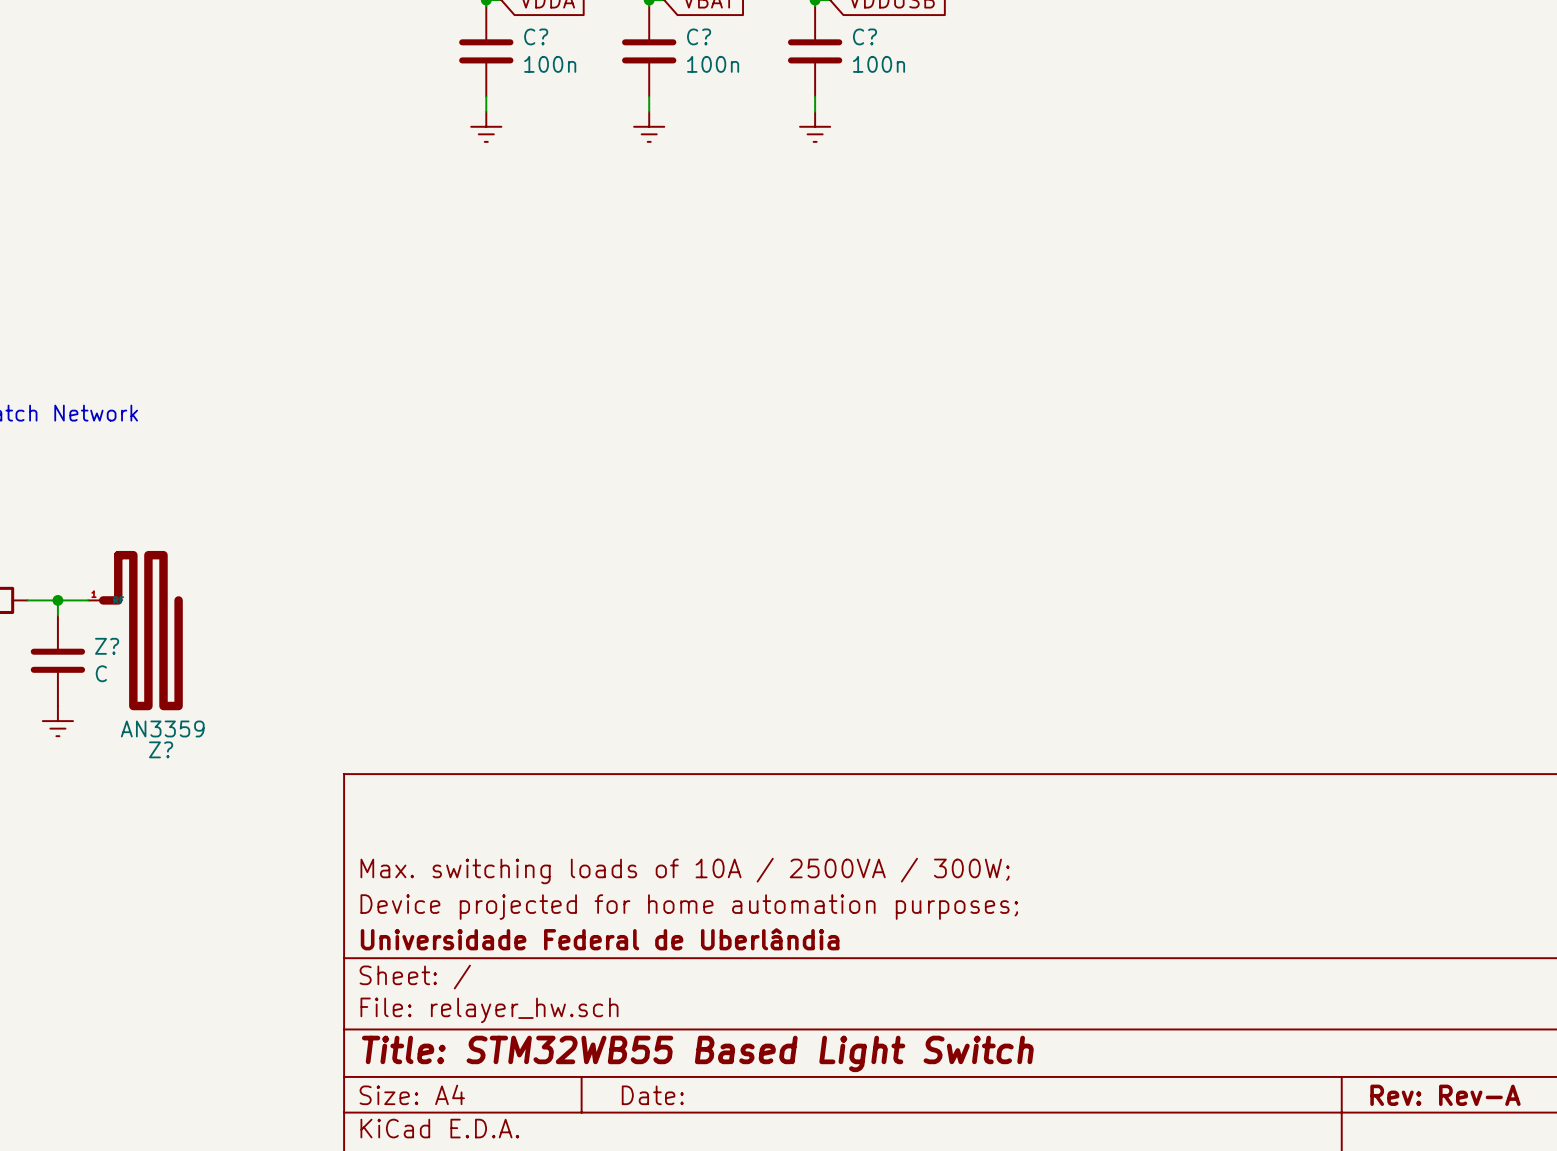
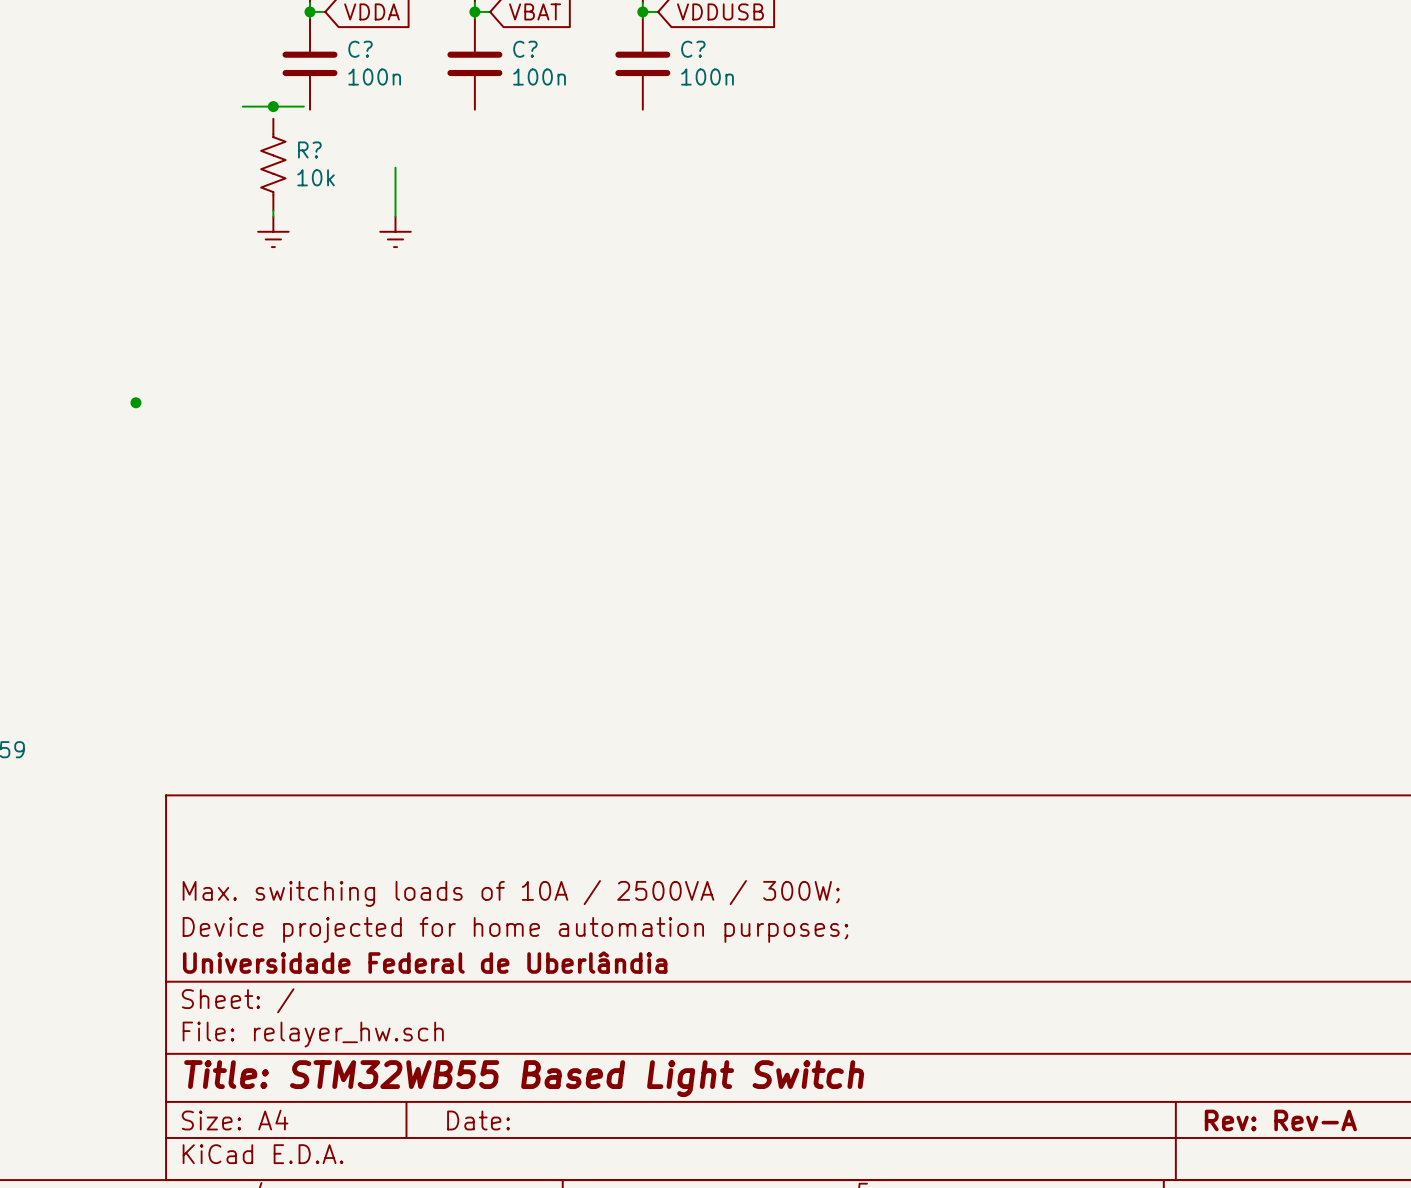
wire: none -> (242, 106) (303, 106)
junction: none -> (273, 106)
wire: (486, 96) (486, 111) -> none
wire: (649, 96) (649, 111) -> none
wire: (815, 96) (815, 111) -> none
power symbol: (486, 126) -> none
power symbol: (649, 126) -> none
power symbol: (815, 126) -> none
R?: none -> 10k (273, 164)
wire: none -> (395, 167) (395, 216)
wire: none -> (273, 210) (273, 216)
power symbol: none -> (273, 231)
power symbol: none -> (395, 231)
junction: none -> (135, 402)

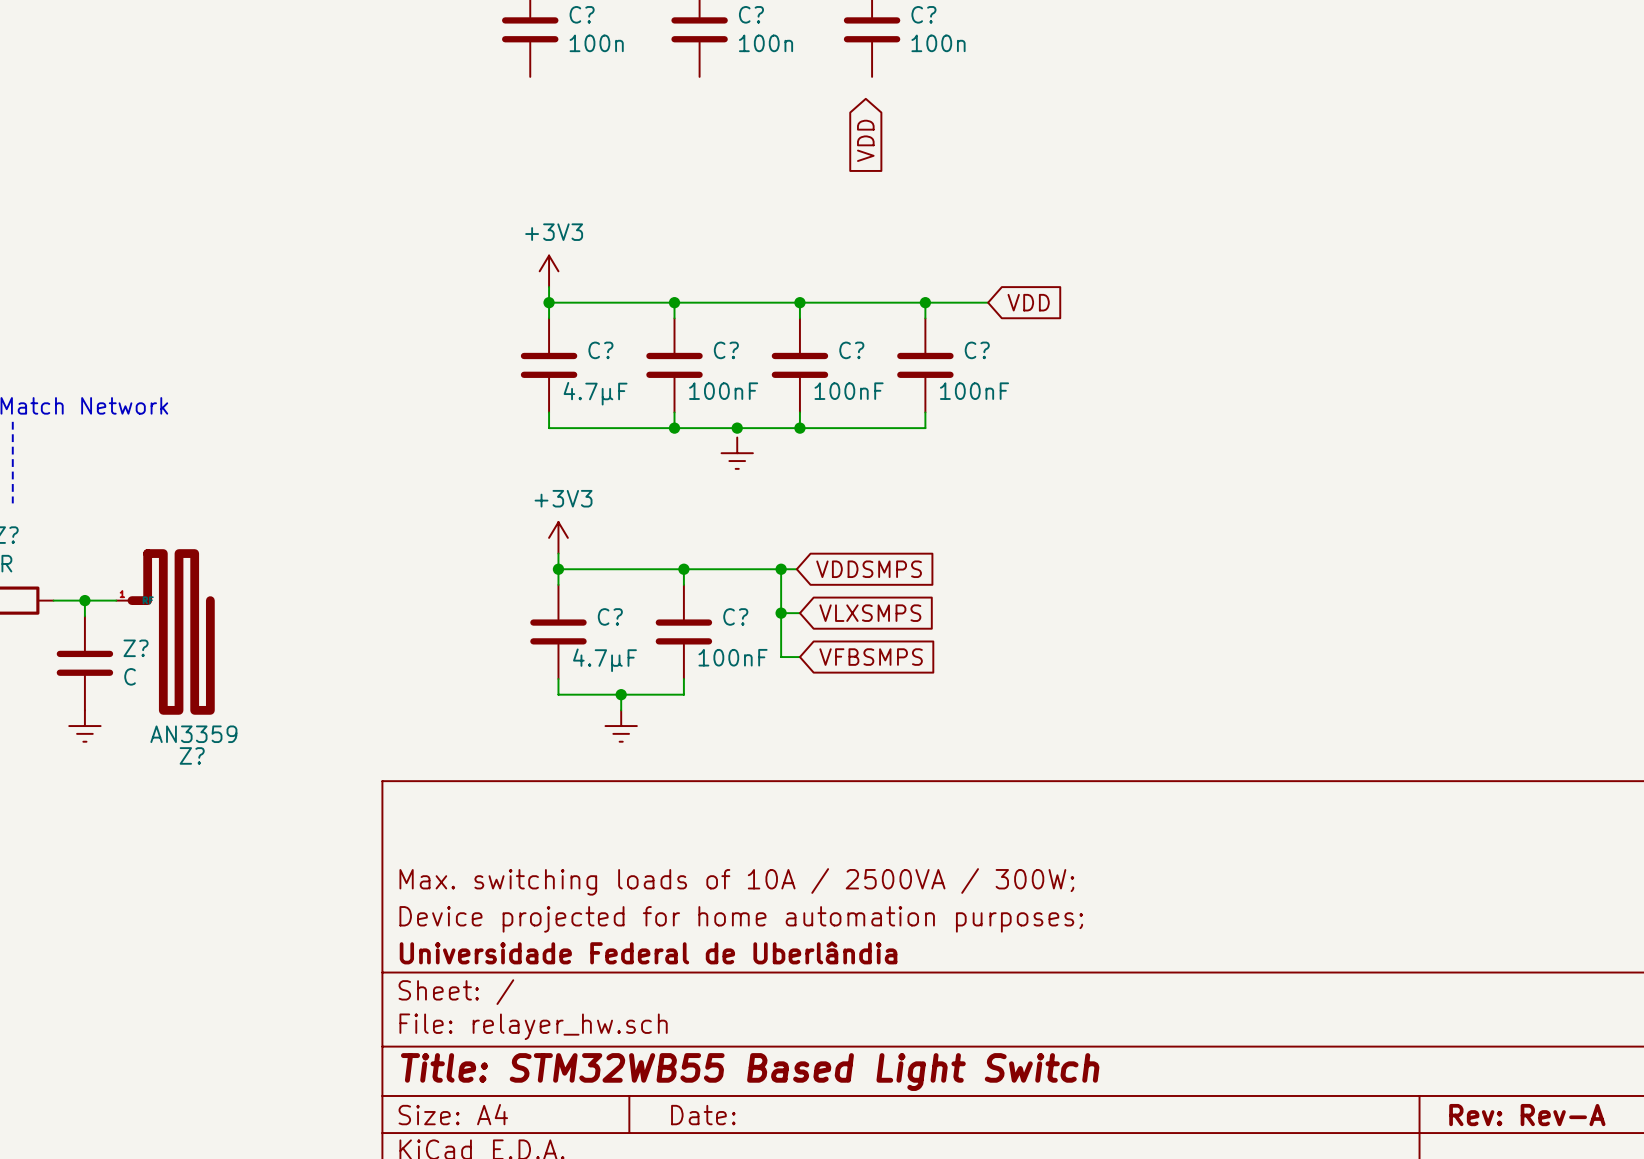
wire: (242, 106) (303, 106) -> none
junction: (273, 106) -> none
R?: 10k (273, 164) -> none
wire: (395, 167) (395, 216) -> none
global label: none -> VDD (865, 140)
wire: (273, 210) (273, 216) -> none
power symbol: (273, 231) -> none
power symbol: (395, 231) -> none
power symbol: none -> +3V3 (549, 271)
wire: none -> (549, 286) (549, 318)
wire: none -> (549, 302) (988, 302)
junction: none -> (549, 302)
wire: none -> (674, 302) (674, 318)
junction: none -> (674, 302)
wire: none -> (799, 302) (799, 318)
junction: none -> (799, 302)
wire: none -> (925, 302) (925, 318)
junction: none -> (925, 302)
global label: none -> VDD (1028, 302)
C?: none -> 4.7μF (549, 365)
C?: none -> 100nF (674, 365)
C?: none -> 100nF (799, 365)
C?: none -> 100nF (925, 365)
junction: (135, 402) -> none
wire: none -> (549, 412) (549, 428) (925, 428) (925, 412)
wire: none -> (674, 412) (674, 428)
wire: none -> (799, 412) (799, 428)
junction: none -> (674, 428)
junction: none -> (737, 428)
junction: none -> (799, 428)
power symbol: none -> (737, 453)
power symbol: none -> +3V3 (558, 537)
wire: none -> (558, 553) (558, 584)
wire: none -> (558, 569) (796, 569)
junction: none -> (558, 569)
wire: none -> (683, 569) (683, 584)
junction: none -> (683, 569)
wire: none -> (781, 569) (781, 657) (799, 657)
junction: none -> (781, 569)
global label: none -> VDDSMPS (869, 569)
wire: none -> (781, 613) (799, 613)
junction: none -> (781, 613)
global label: none -> VLXSMPS (870, 613)
C?: none -> 4.7μF (558, 631)
C?: none -> 100nF (683, 631)
global label: none -> VFBSMPS (871, 657)
wire: none -> (558, 679) (558, 694) (683, 694) (683, 679)
wire: none -> (621, 694) (621, 710)
junction: none -> (621, 694)
power symbol: none -> (621, 726)

